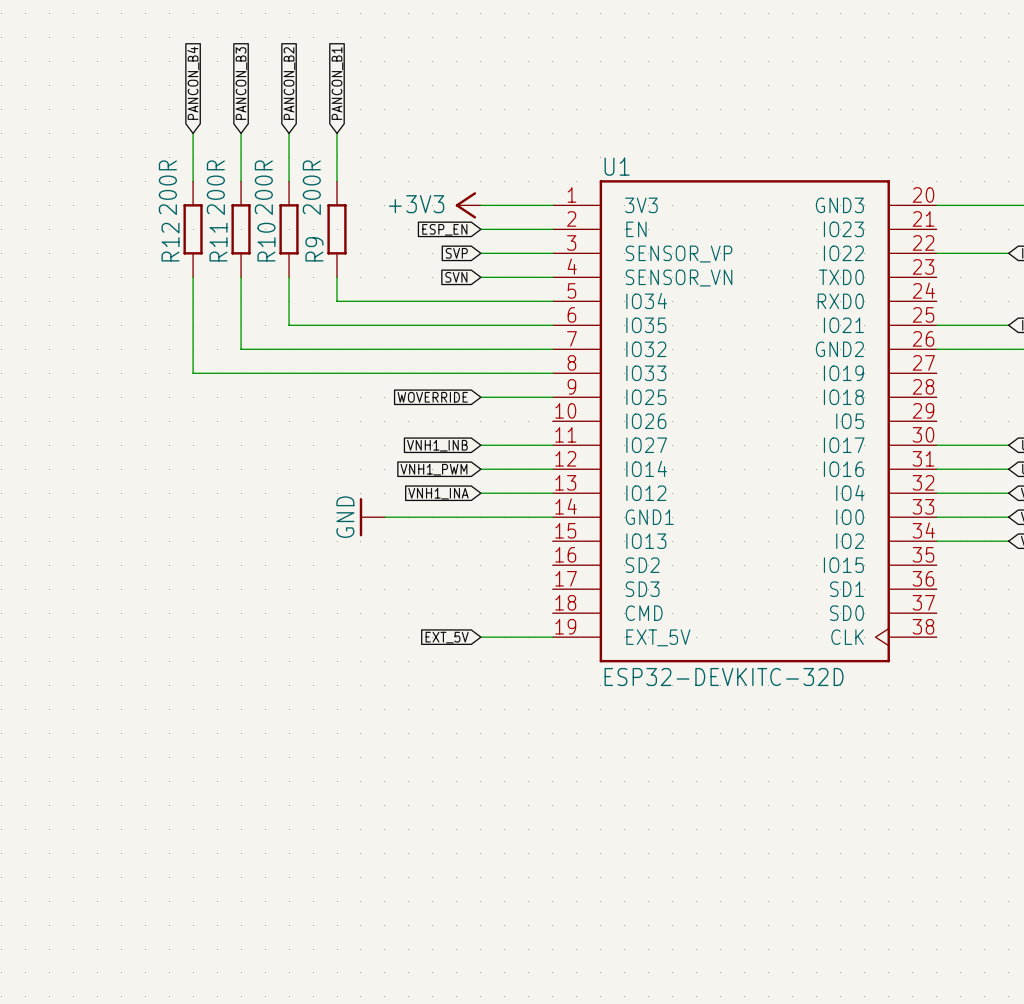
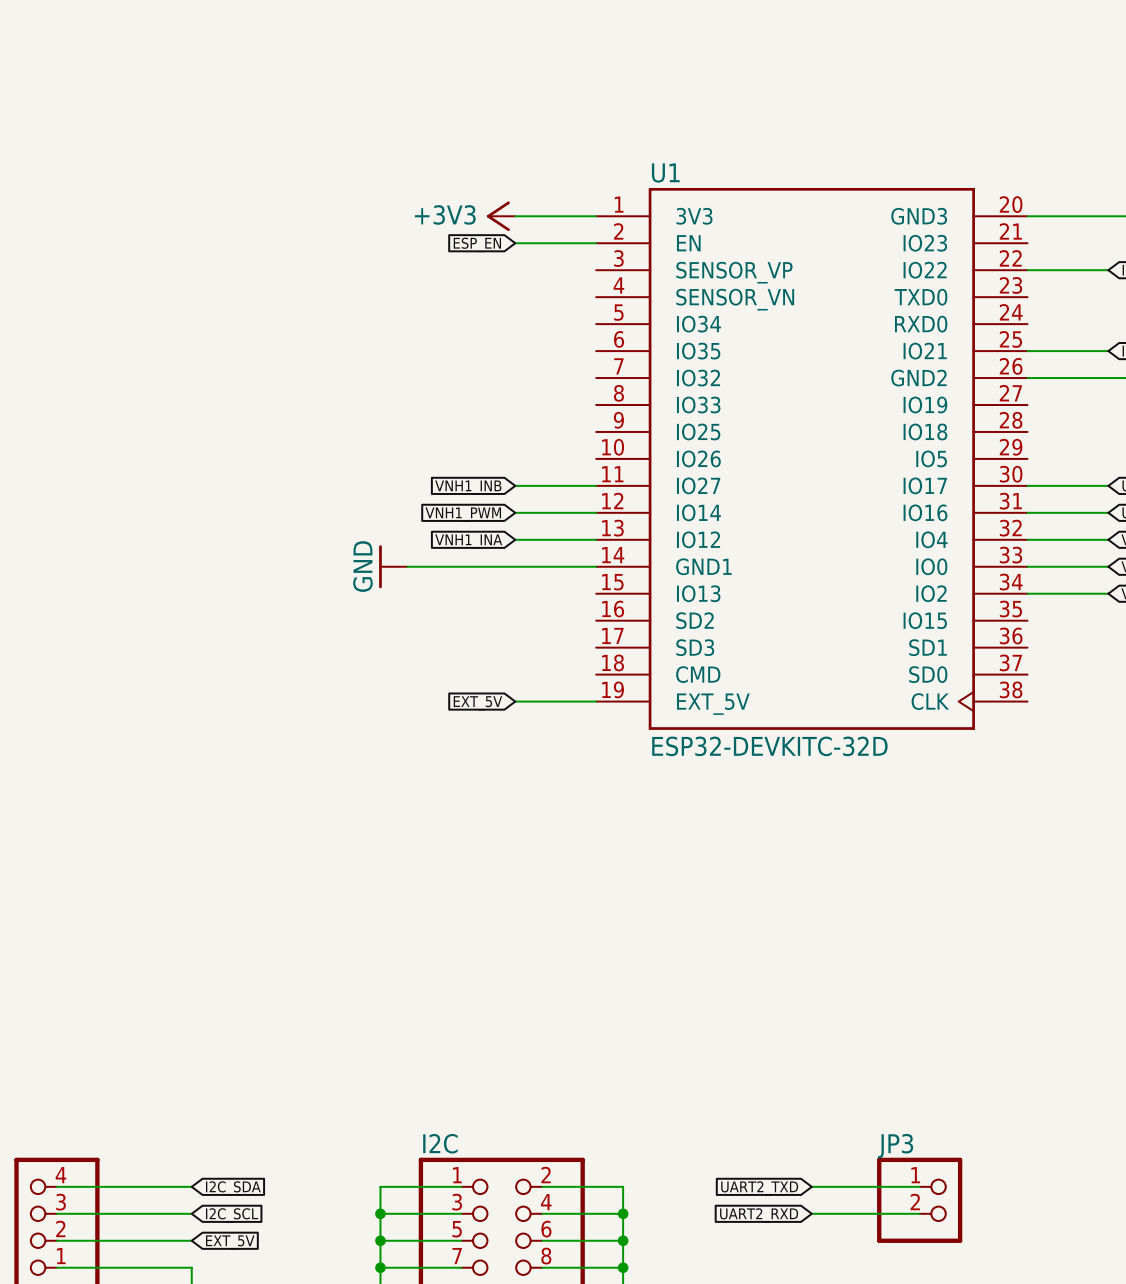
global label: PANCON_B4 (193, 83) -> none
global label: PANCON_B3 (241, 83) -> none
global label: PANCON_B2 (289, 83) -> none
global label: PANCON_B1 (337, 83) -> none
wire: (193, 133) (193, 181) -> none
wire: (241, 133) (241, 181) -> none
wire: (289, 133) (289, 181) -> none
wire: (337, 133) (337, 181) -> none
R12: 200R (193, 229) -> none
R11: 200R (241, 229) -> none
R10: 200R (289, 229) -> none
R9: 200R (337, 229) -> none
global label: SVP (456, 253) -> none
wire: (480, 253) (552, 253) -> none
wire: (193, 277) (193, 373) (552, 373) -> none
wire: (241, 277) (241, 349) (552, 349) -> none
wire: (289, 277) (289, 325) (552, 325) -> none
wire: (337, 277) (337, 301) (552, 301) -> none
global label: SVN (456, 277) -> none
wire: (480, 277) (552, 277) -> none
global label: WOVERRIDE (432, 397) -> none
wire: (480, 397) (552, 397) -> none

